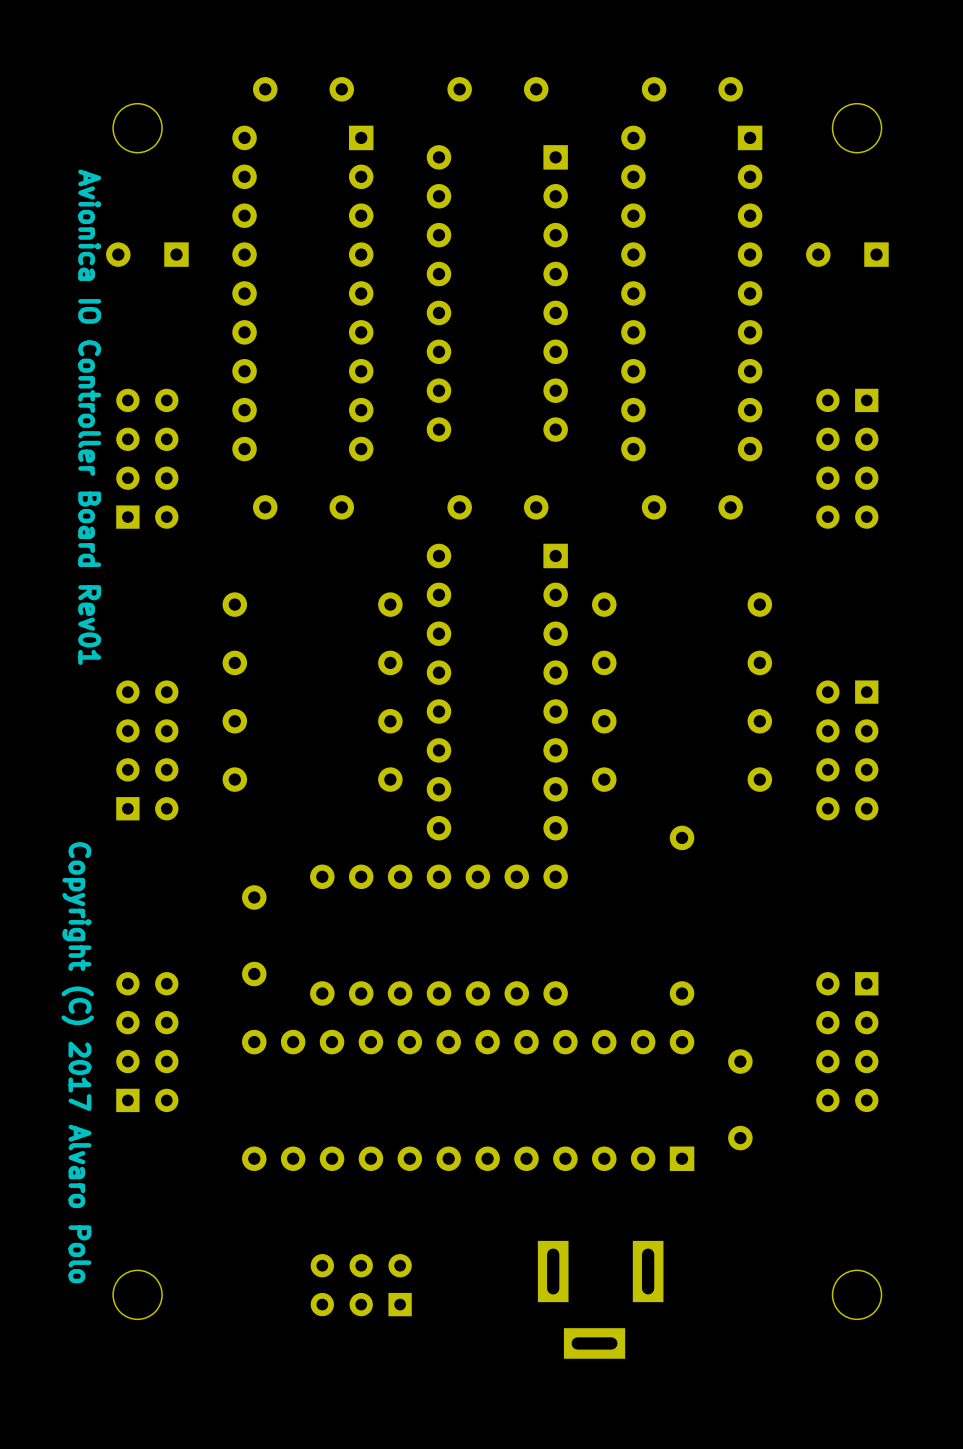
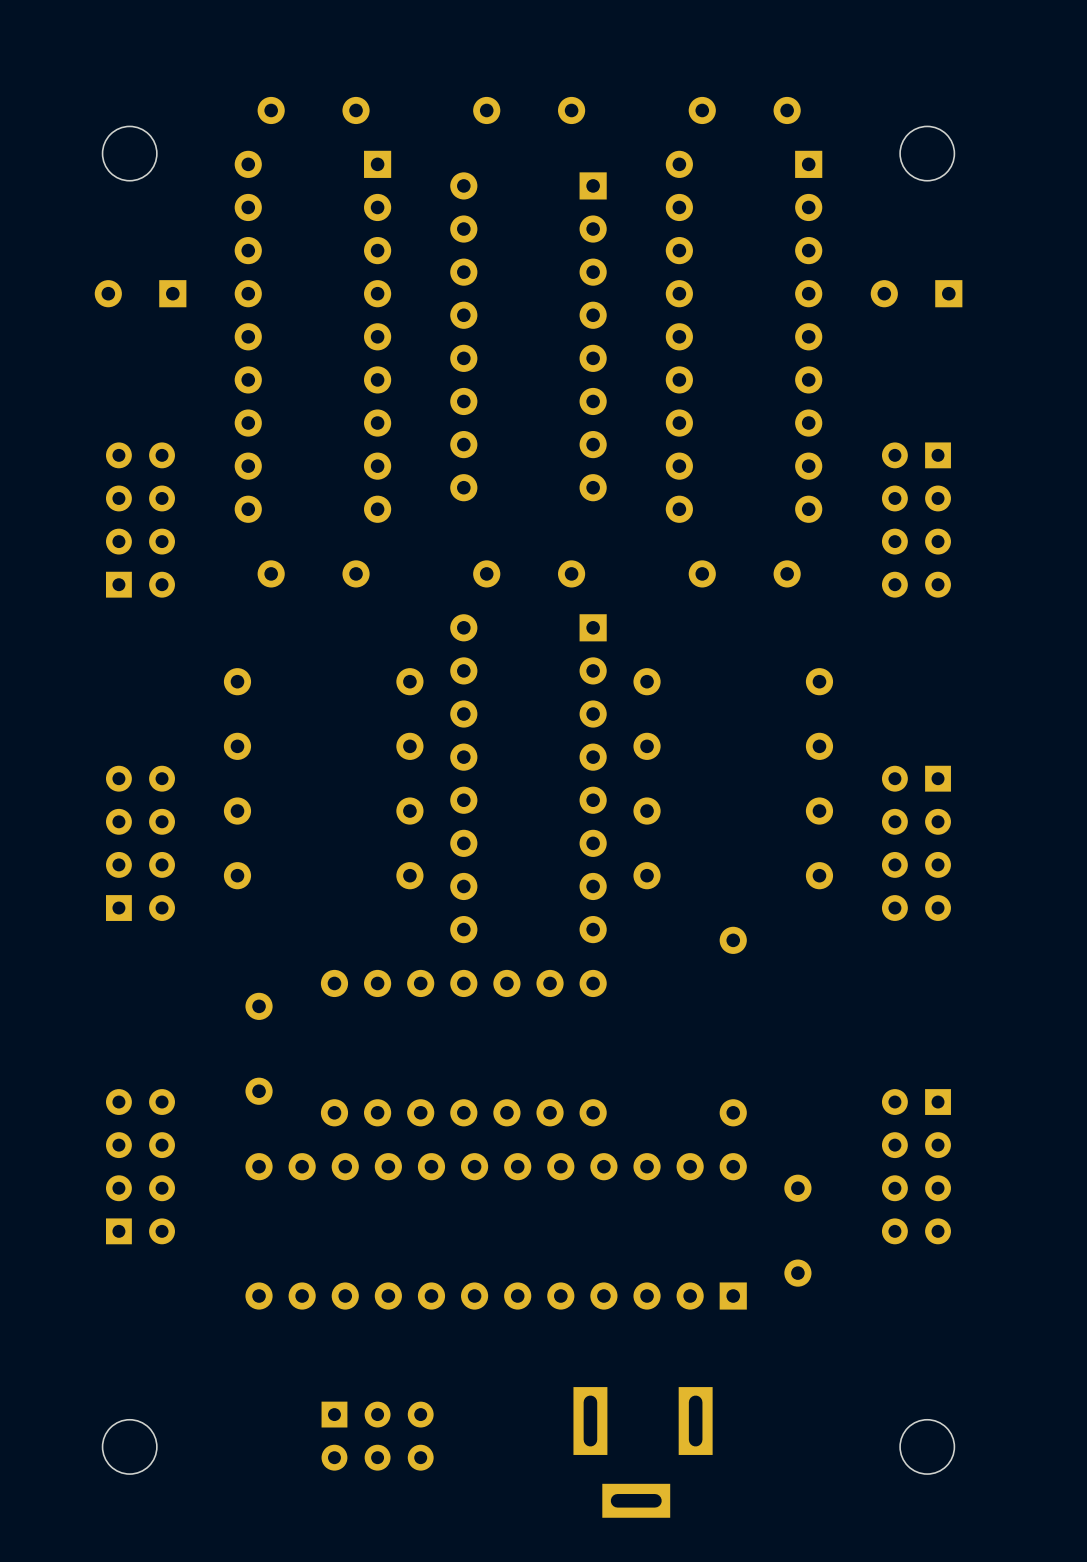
text: Avionica IO Controller Board Rev01 (89, 417) -> none
text: Copyright (C) 2017 Alvaro Polo (77, 1062) -> none
part rotation: 0° (361, 1285) -> 180° (377, 1436)

